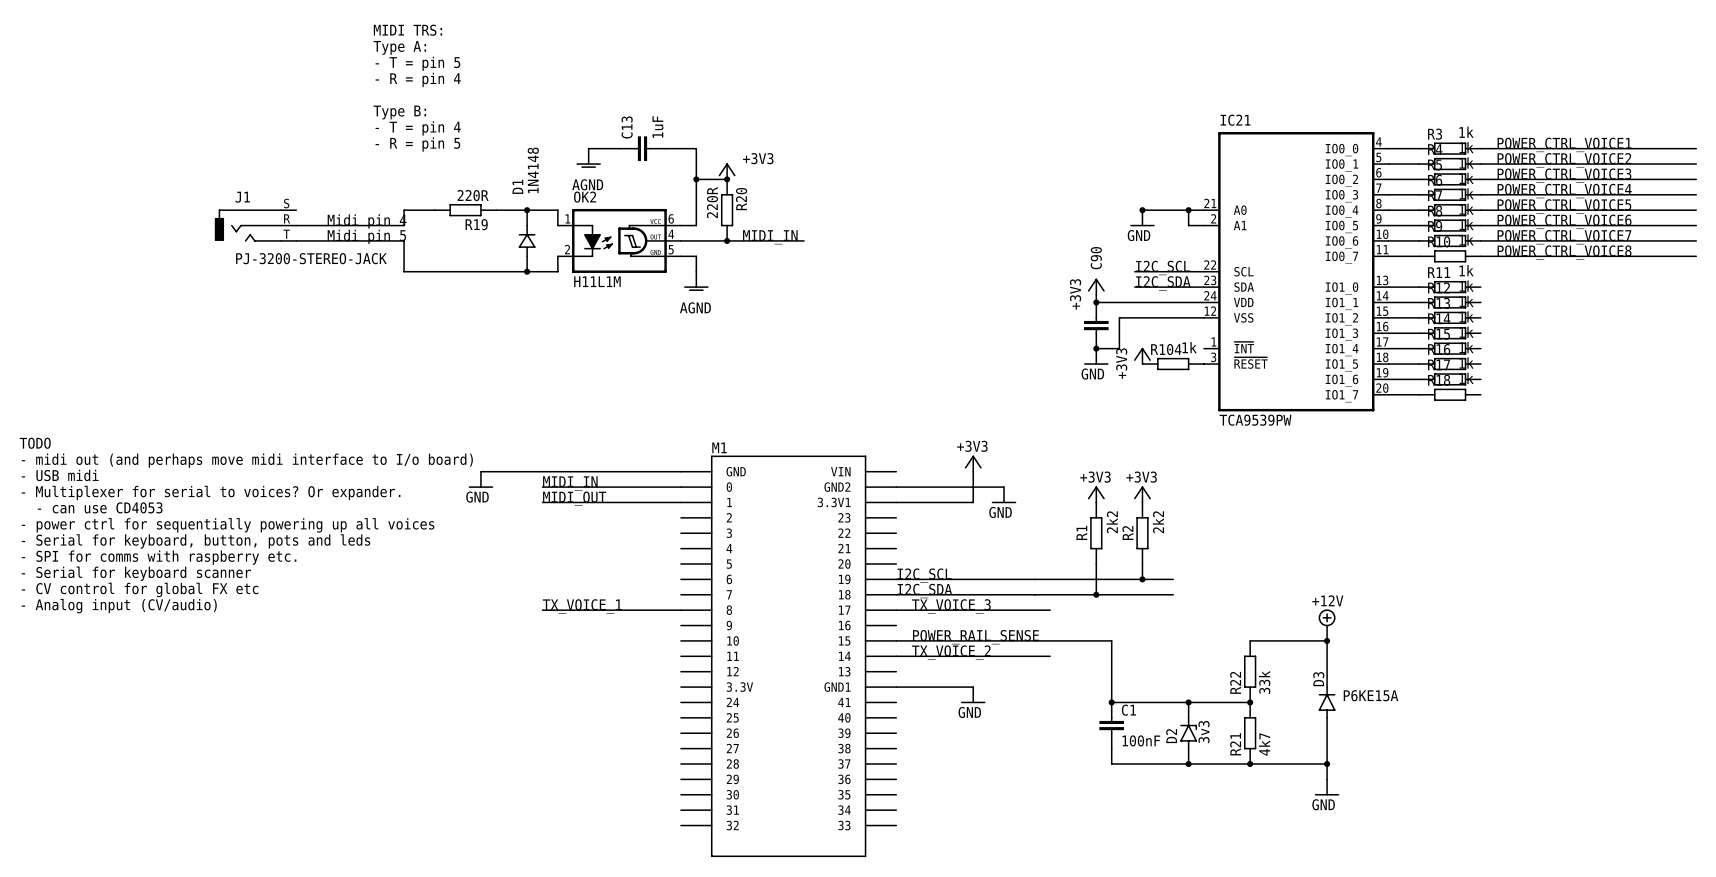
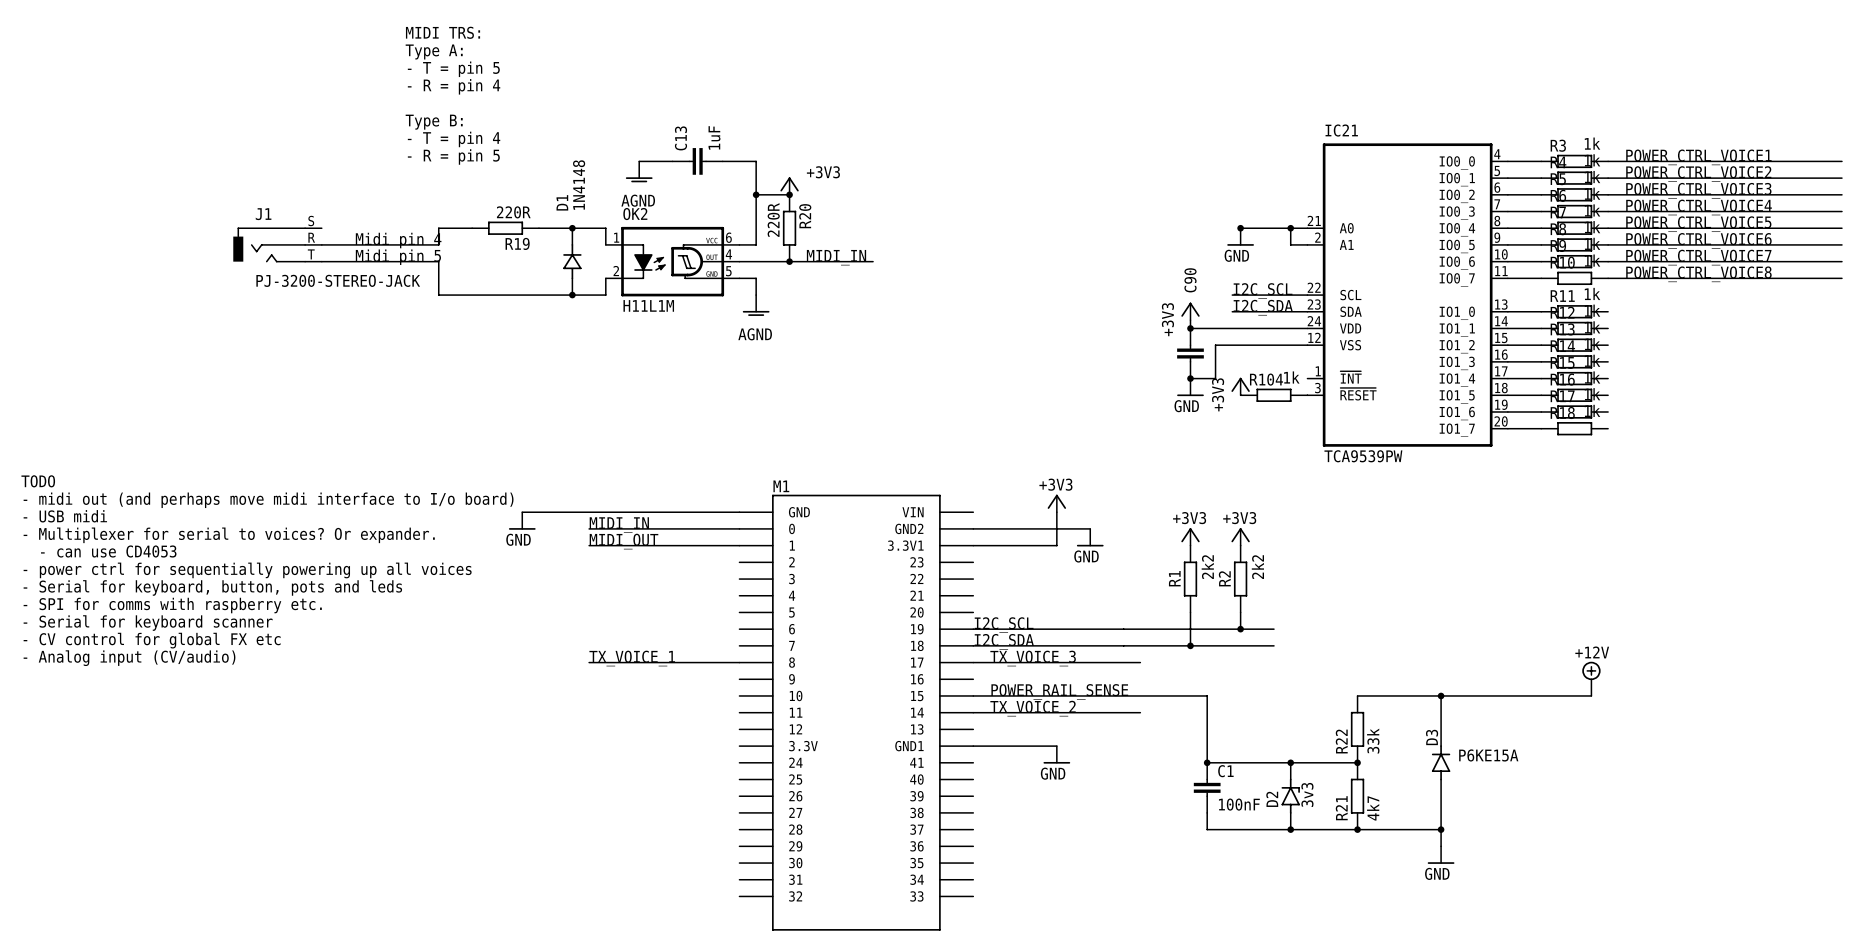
power symbol position: +12V (1327, 625) -> +12V (1591, 678)
wire: none -> (1441, 695) (1591, 695)

